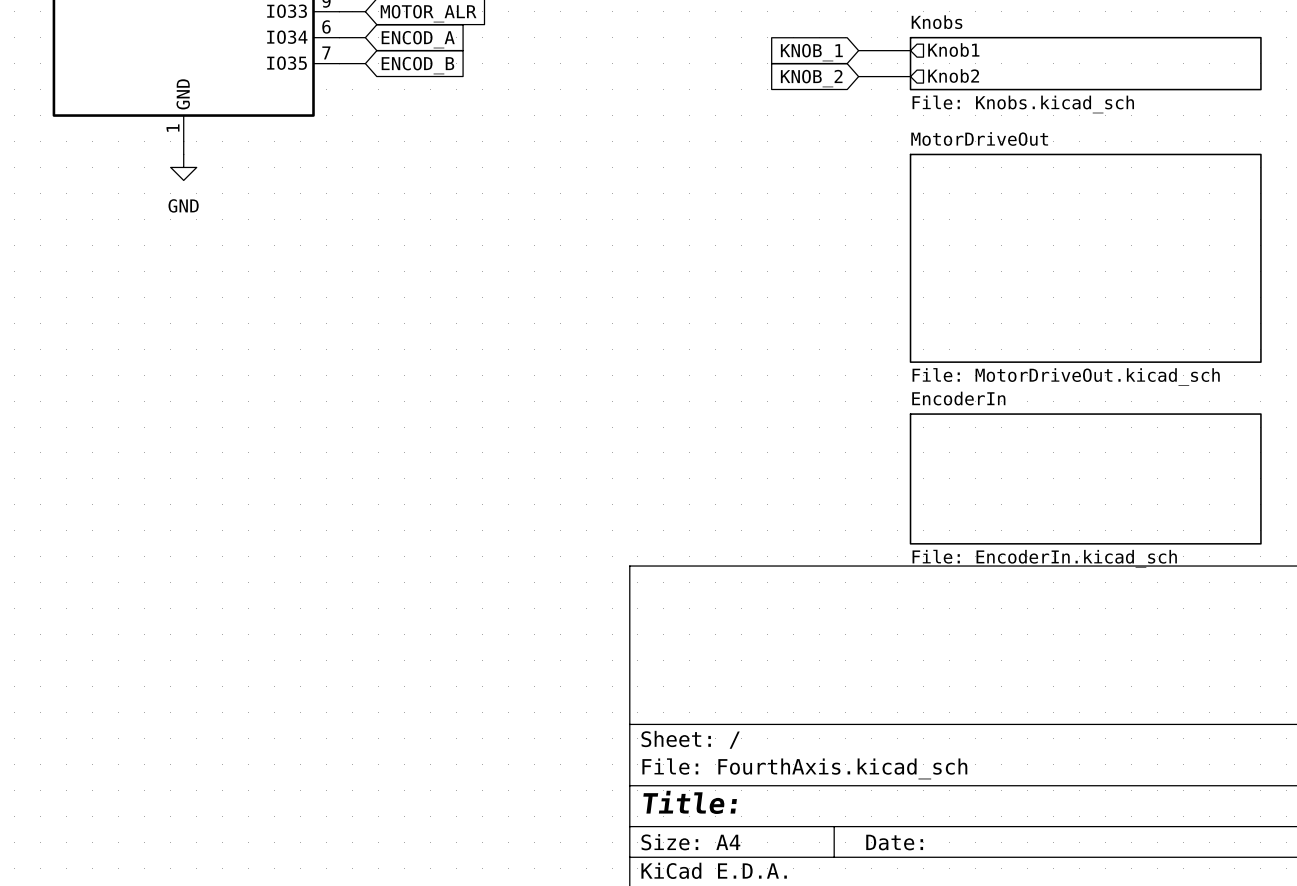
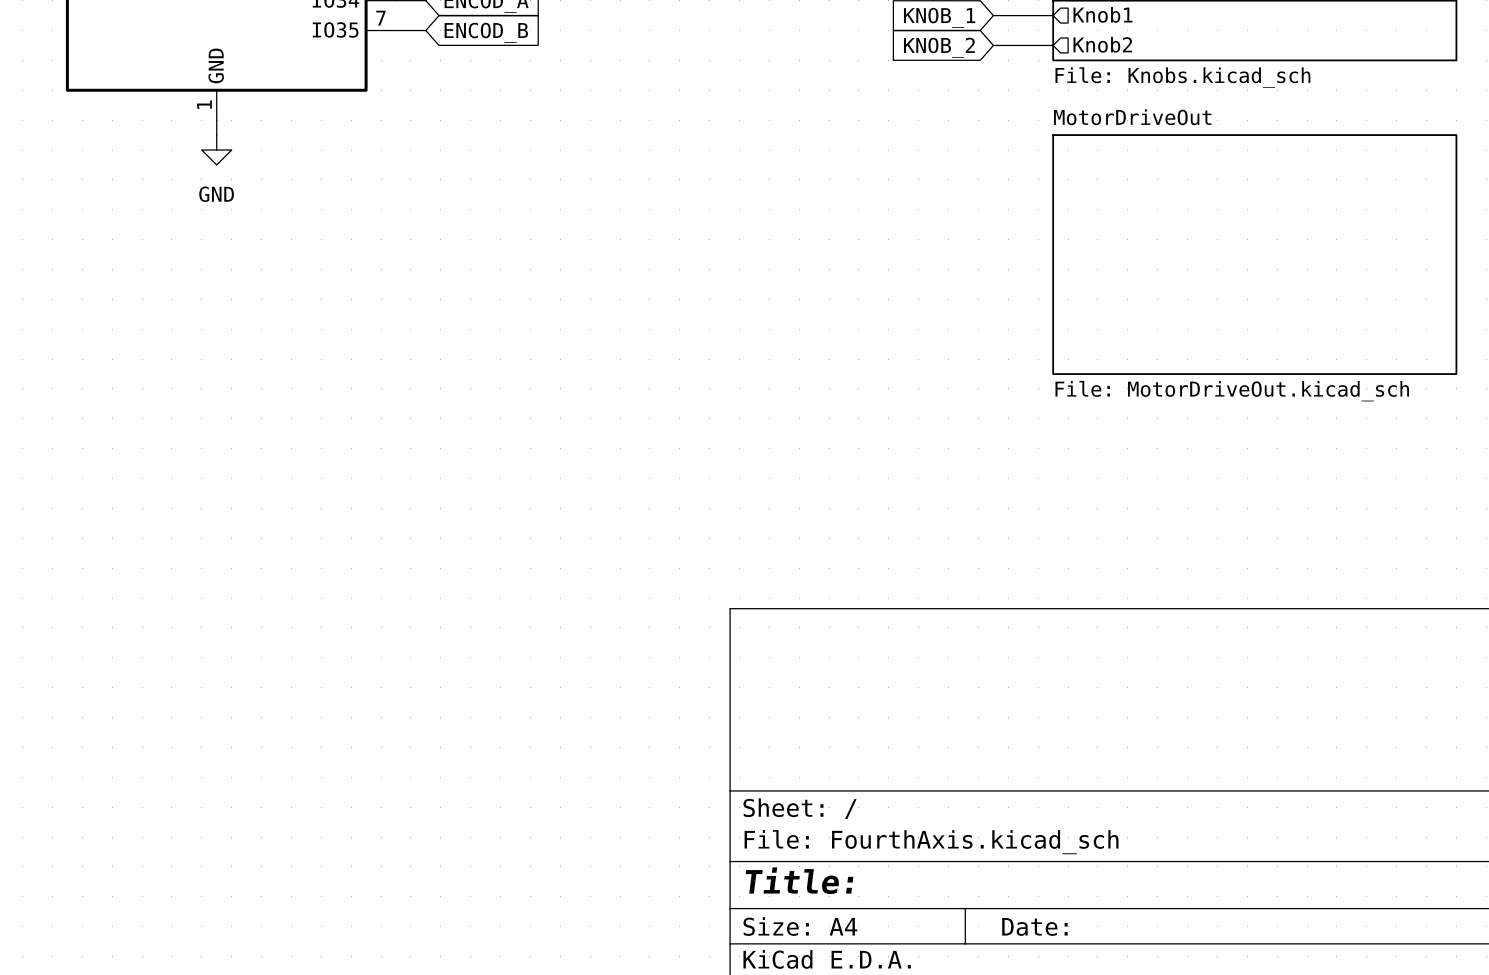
sheet EncoderIn: File: EncoderIn.kicad_sch (1085, 478) -> none

